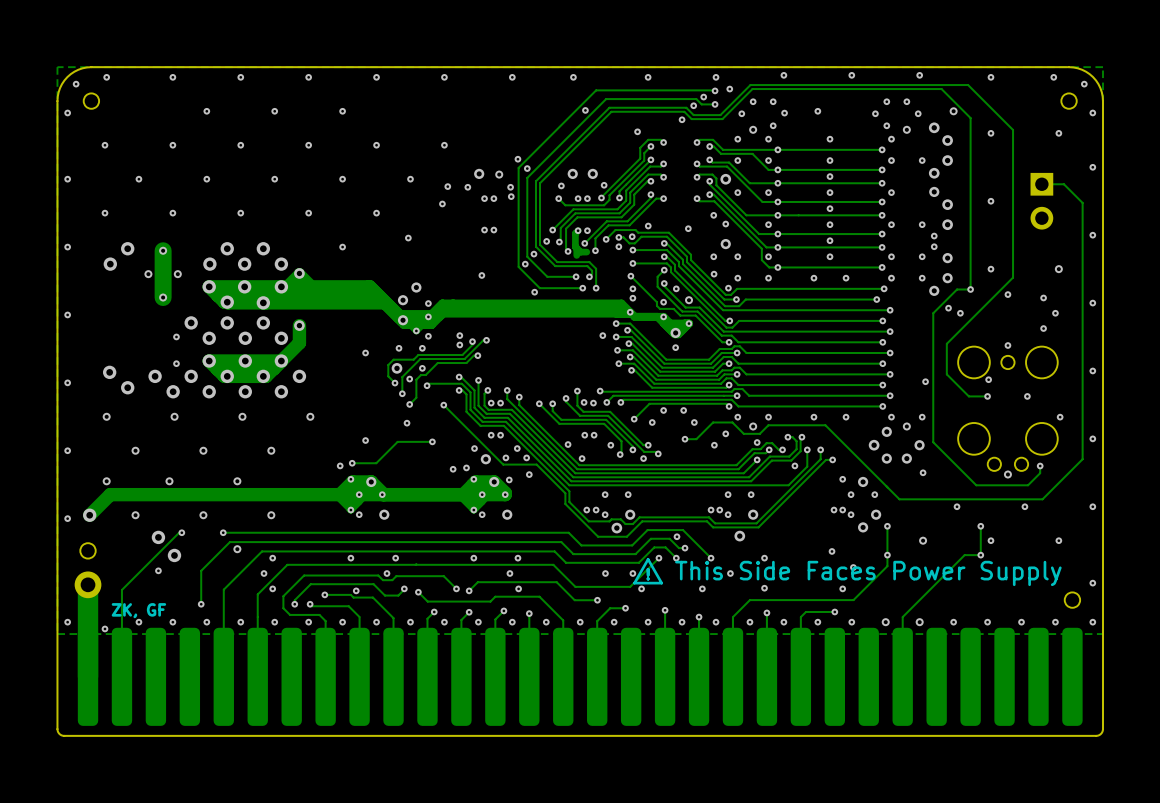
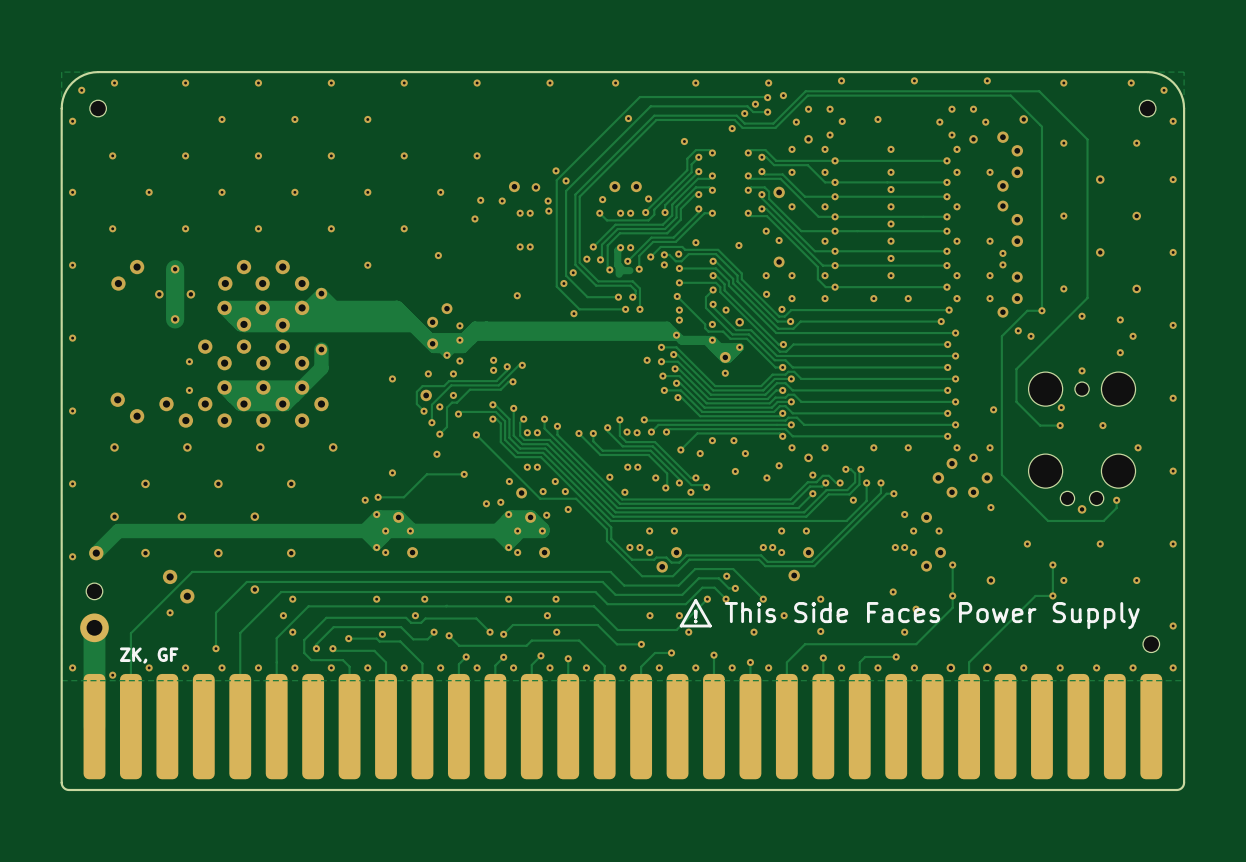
via: none -> (1100, 179)
track: (1041, 184) (1063, 184) (1082, 202) (1082, 459) (1042, 499) (899, 499) (825, 425) (768, 425) (759, 433) (743, 433) (732, 422) (713, 422) (696, 439) (685, 439) -> none
part: (1041, 201) -> none
via: none -> (1136, 216)
via: none -> (1100, 252)
via: (181, 532) -> none
track: none -> (239, 571) (195, 571)
via: (223, 532) -> none

